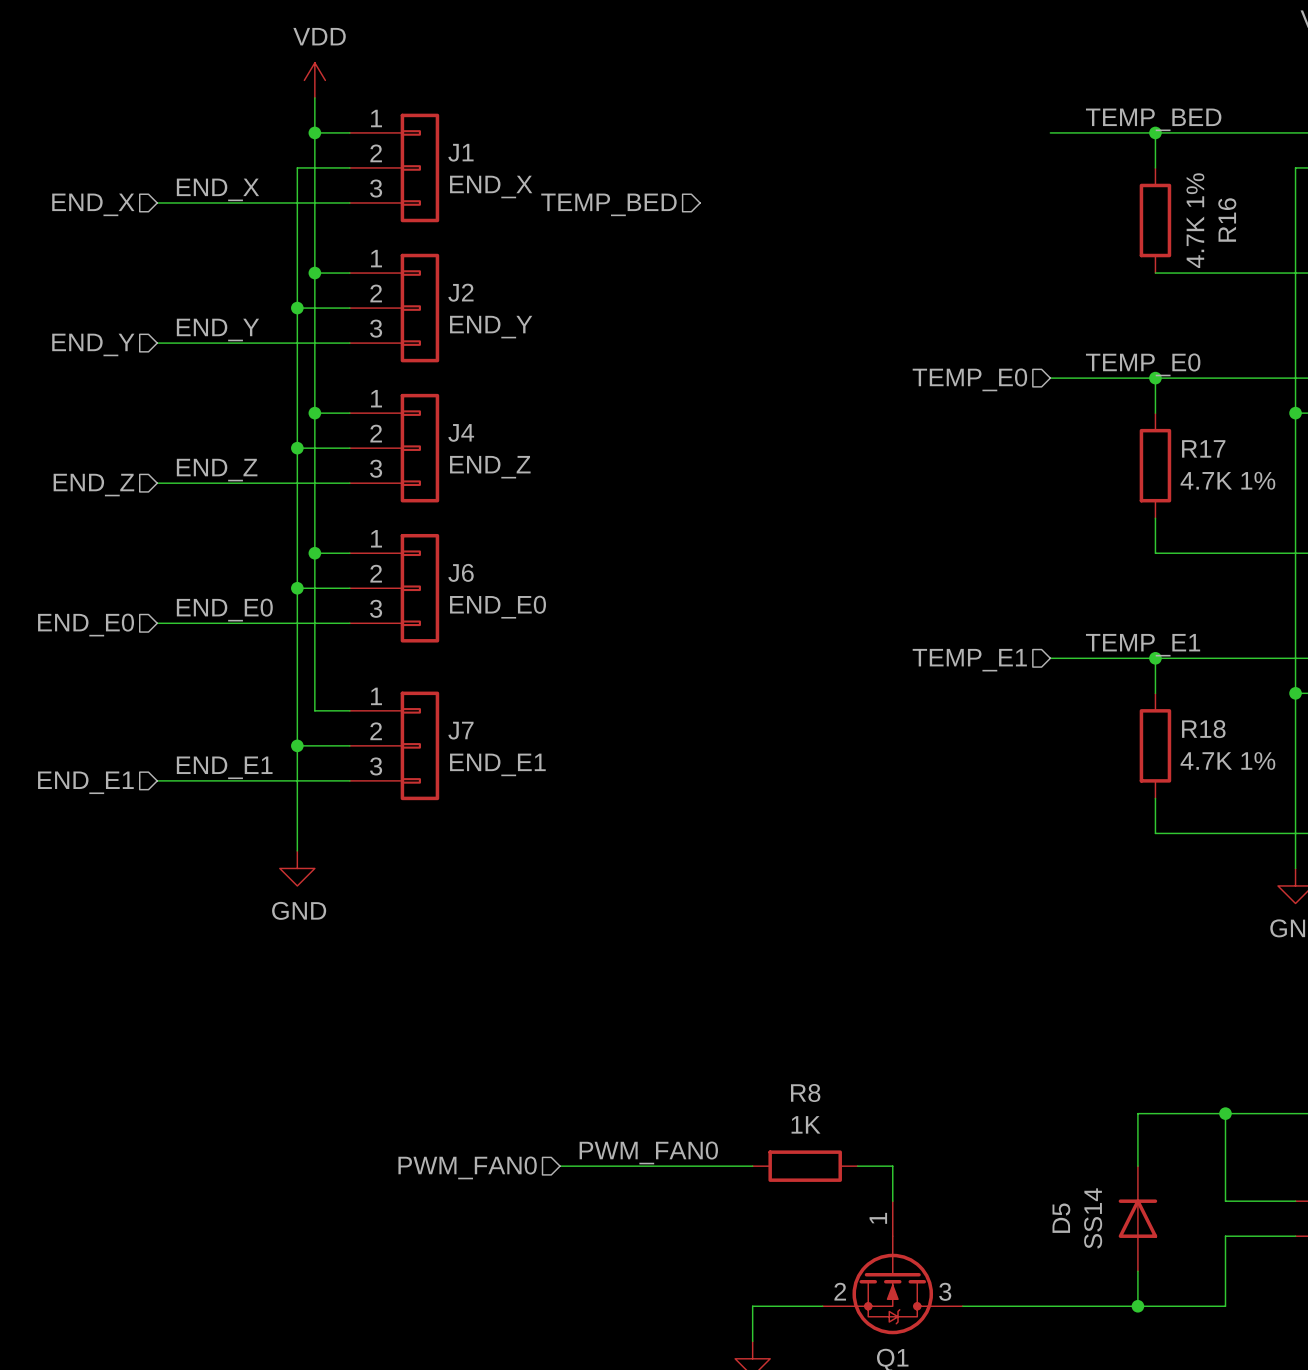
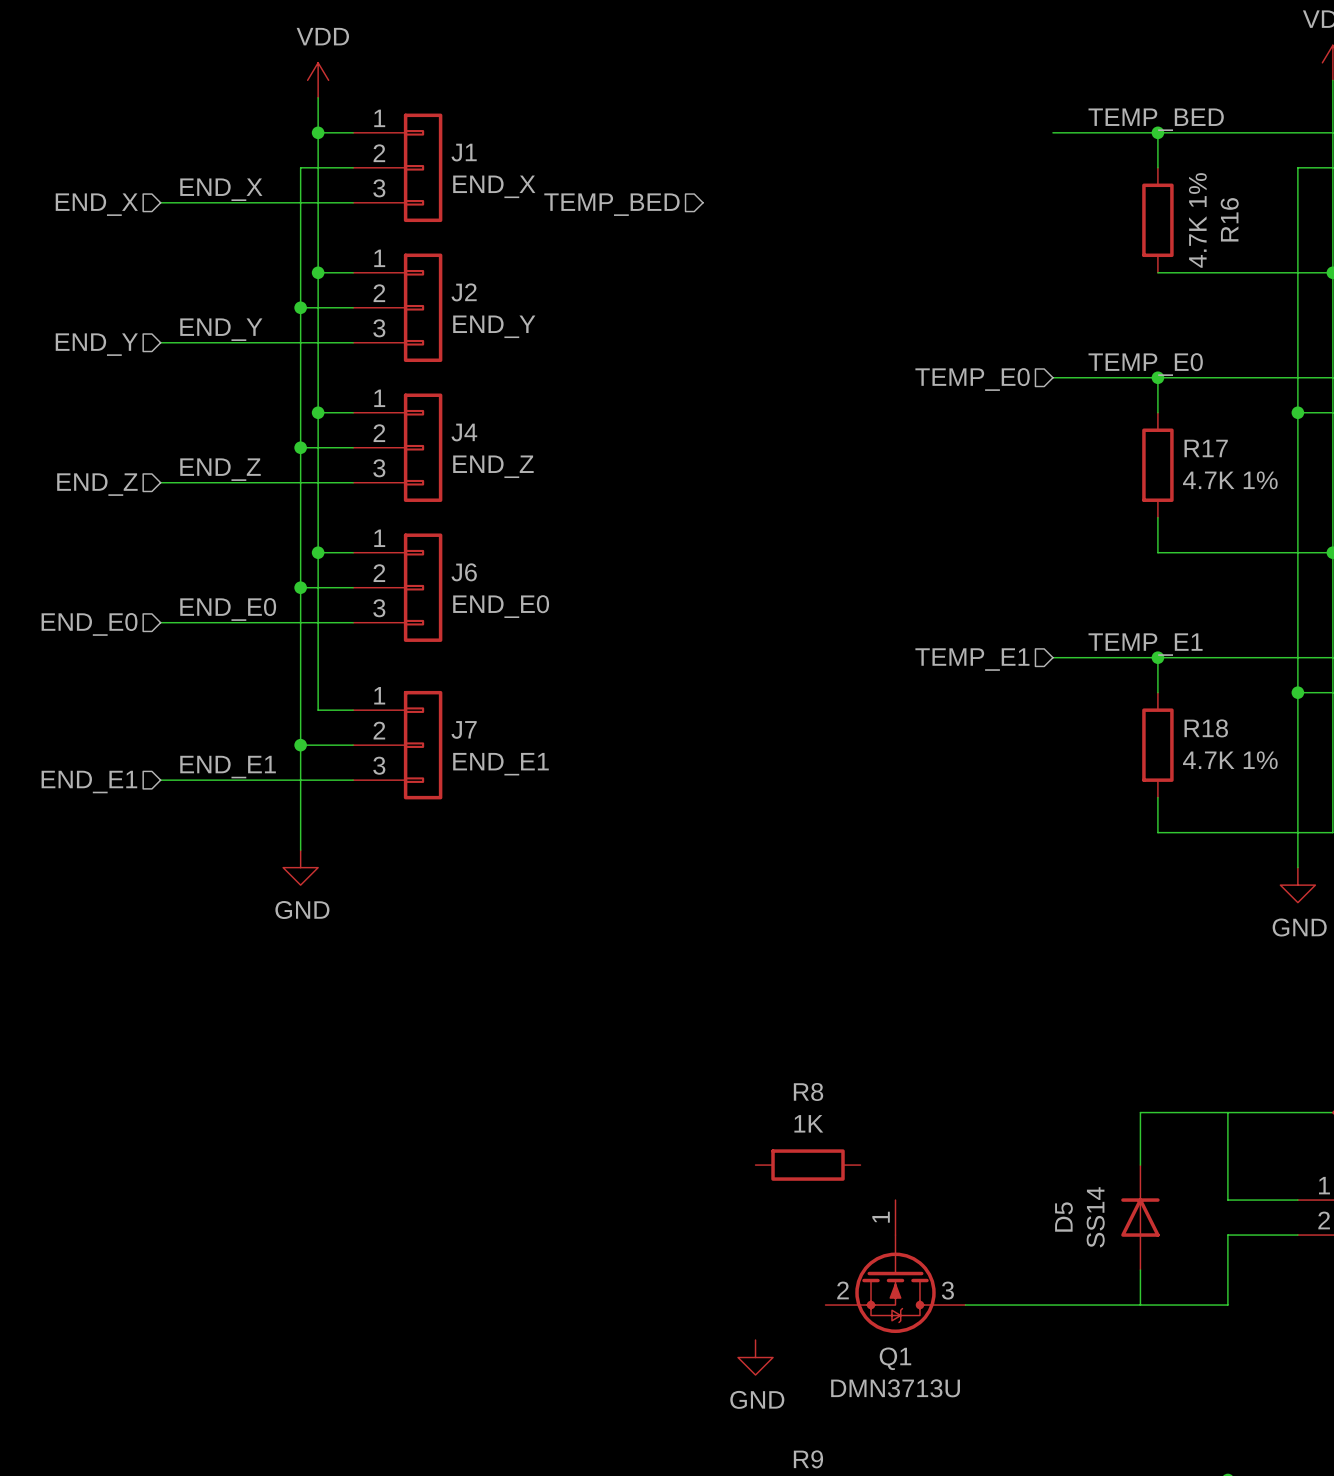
junction: (1225, 1113) -> none
label: PWM_FAN0 (648, 1152) -> none
wire: (560, 1166) (752, 1166) -> none
wire: (857, 1166) (892, 1166) (892, 1201) -> none
hierarchical label: PWM_FAN0 (467, 1167) -> none
wire: (822, 1306) (752, 1306) (752, 1341) -> none
junction: (1137, 1306) -> none

